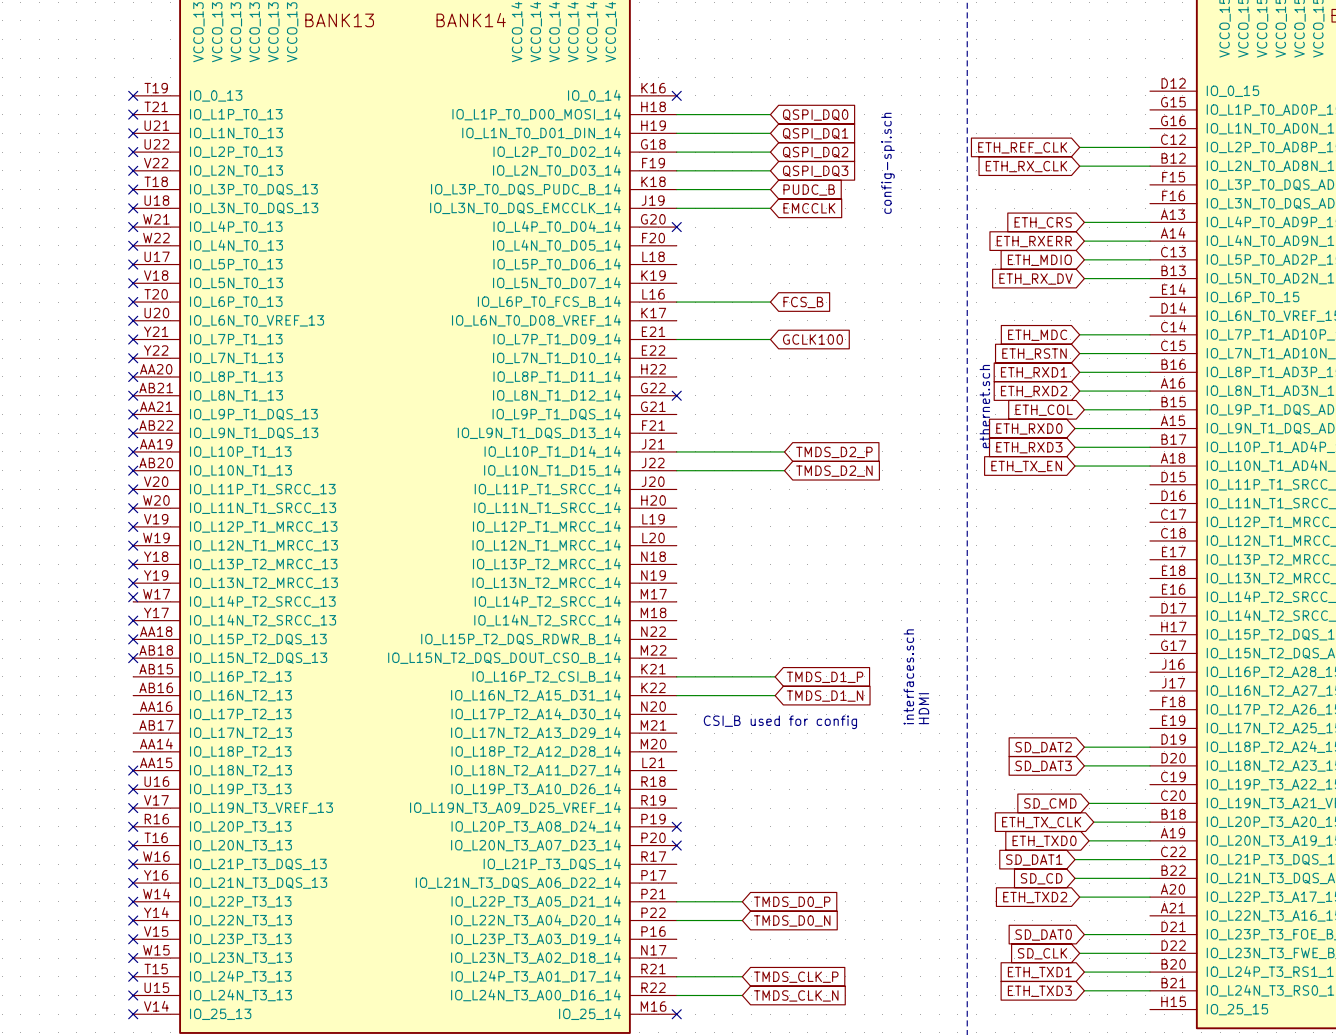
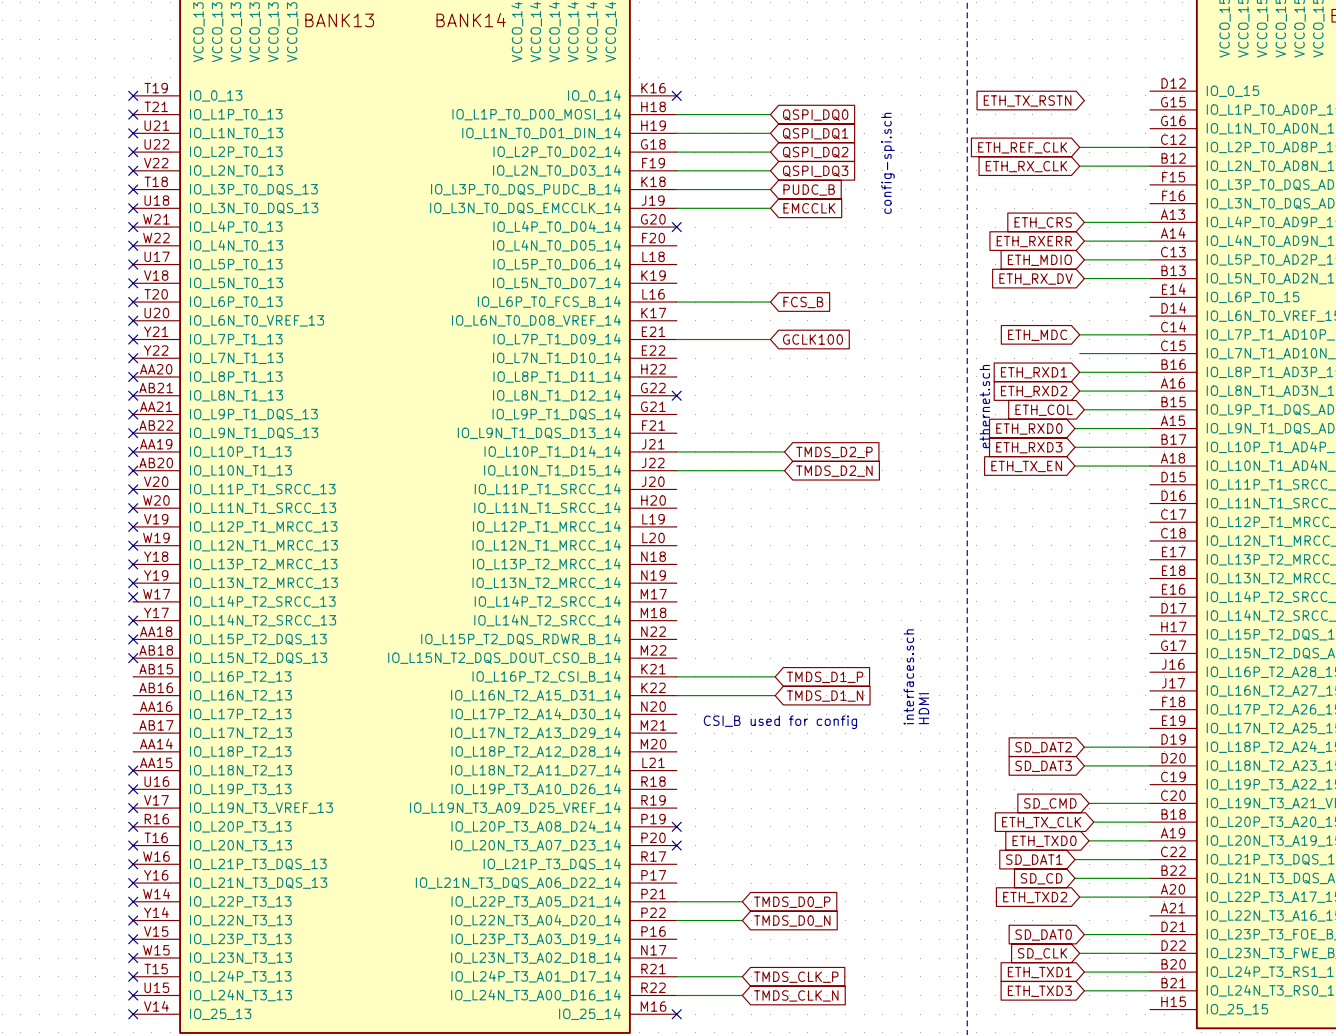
global label: none -> ETH_TX_RSTN (1027, 100)
global label: ETH_RSTN (1034, 354) -> none

